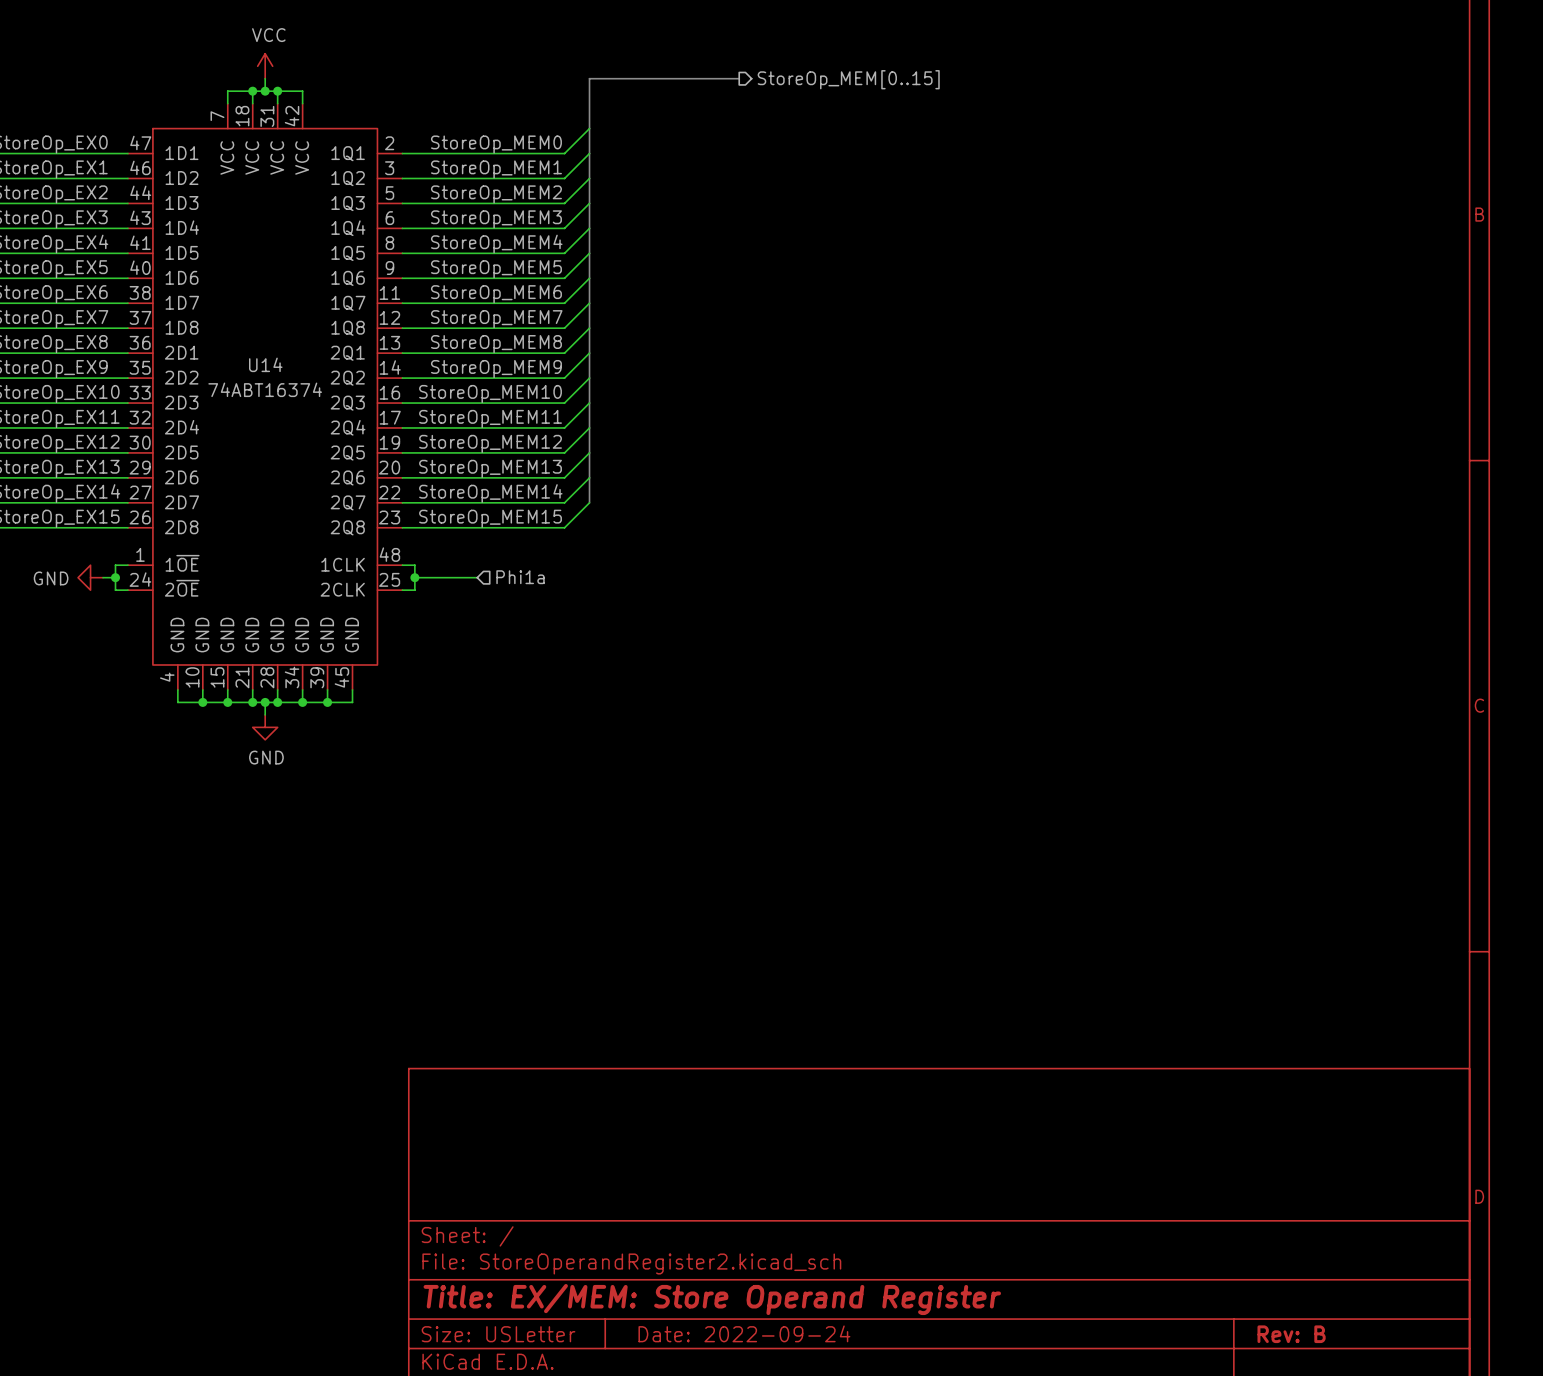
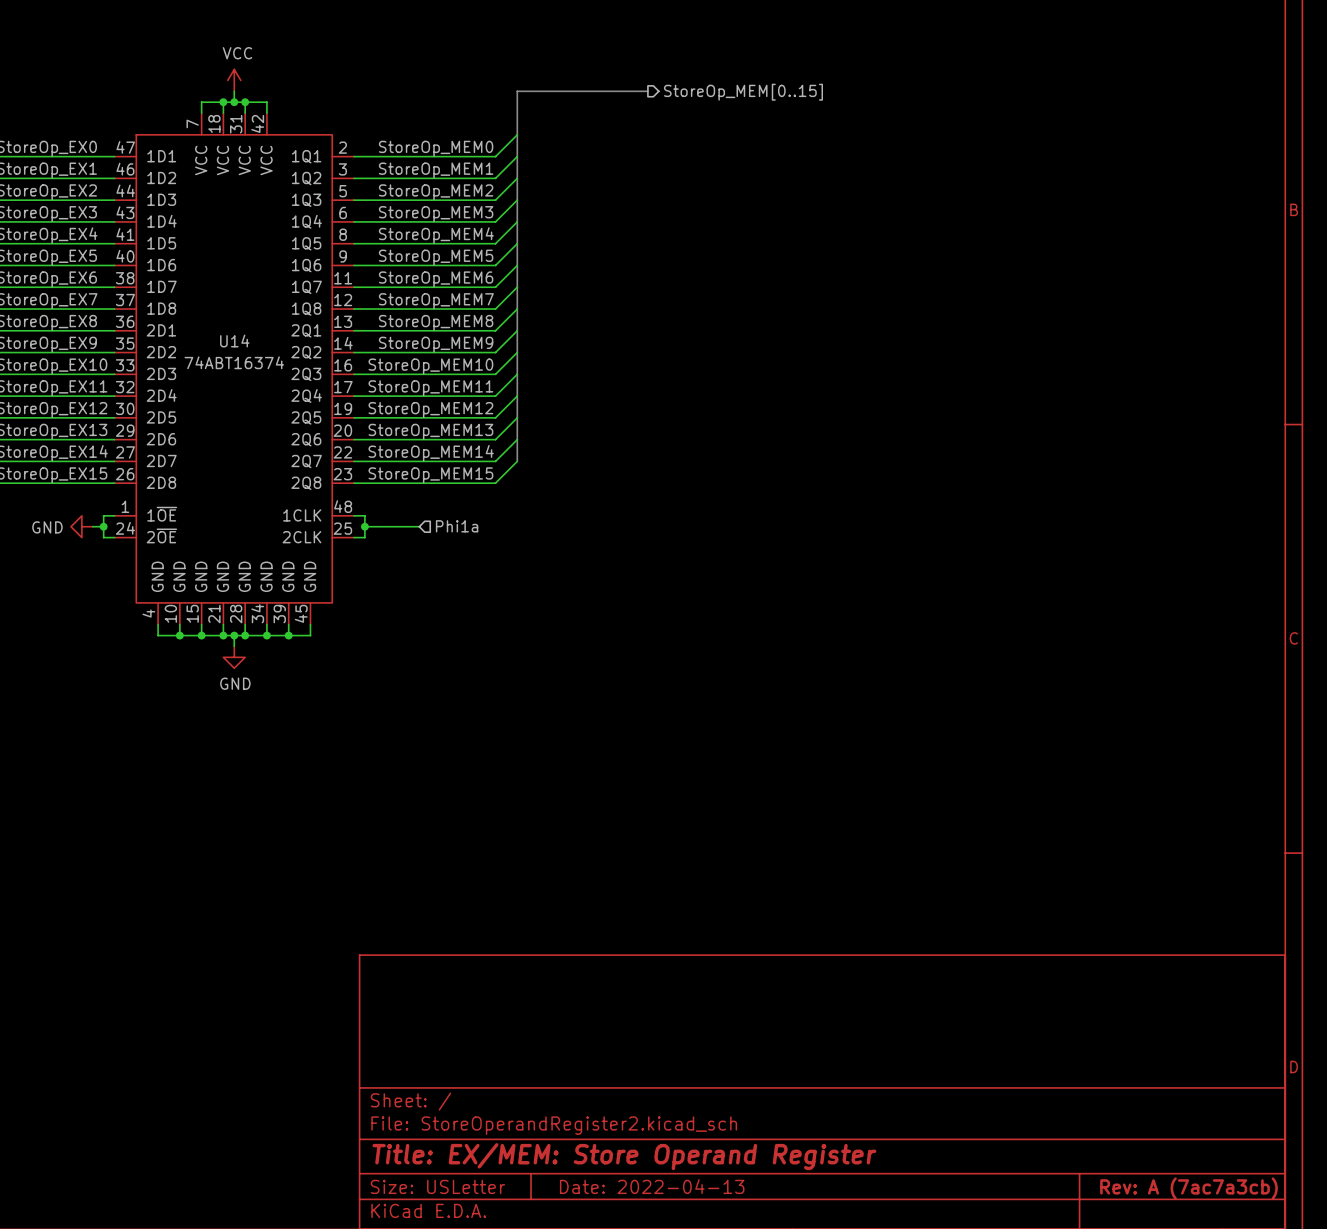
title block: Date: 2022-09-24 (744, 1333) -> Date: 2022-04-13 (652, 1186)
title block: Rev: B (1291, 1334) -> Rev: A (7ac7a3cb) (1189, 1188)

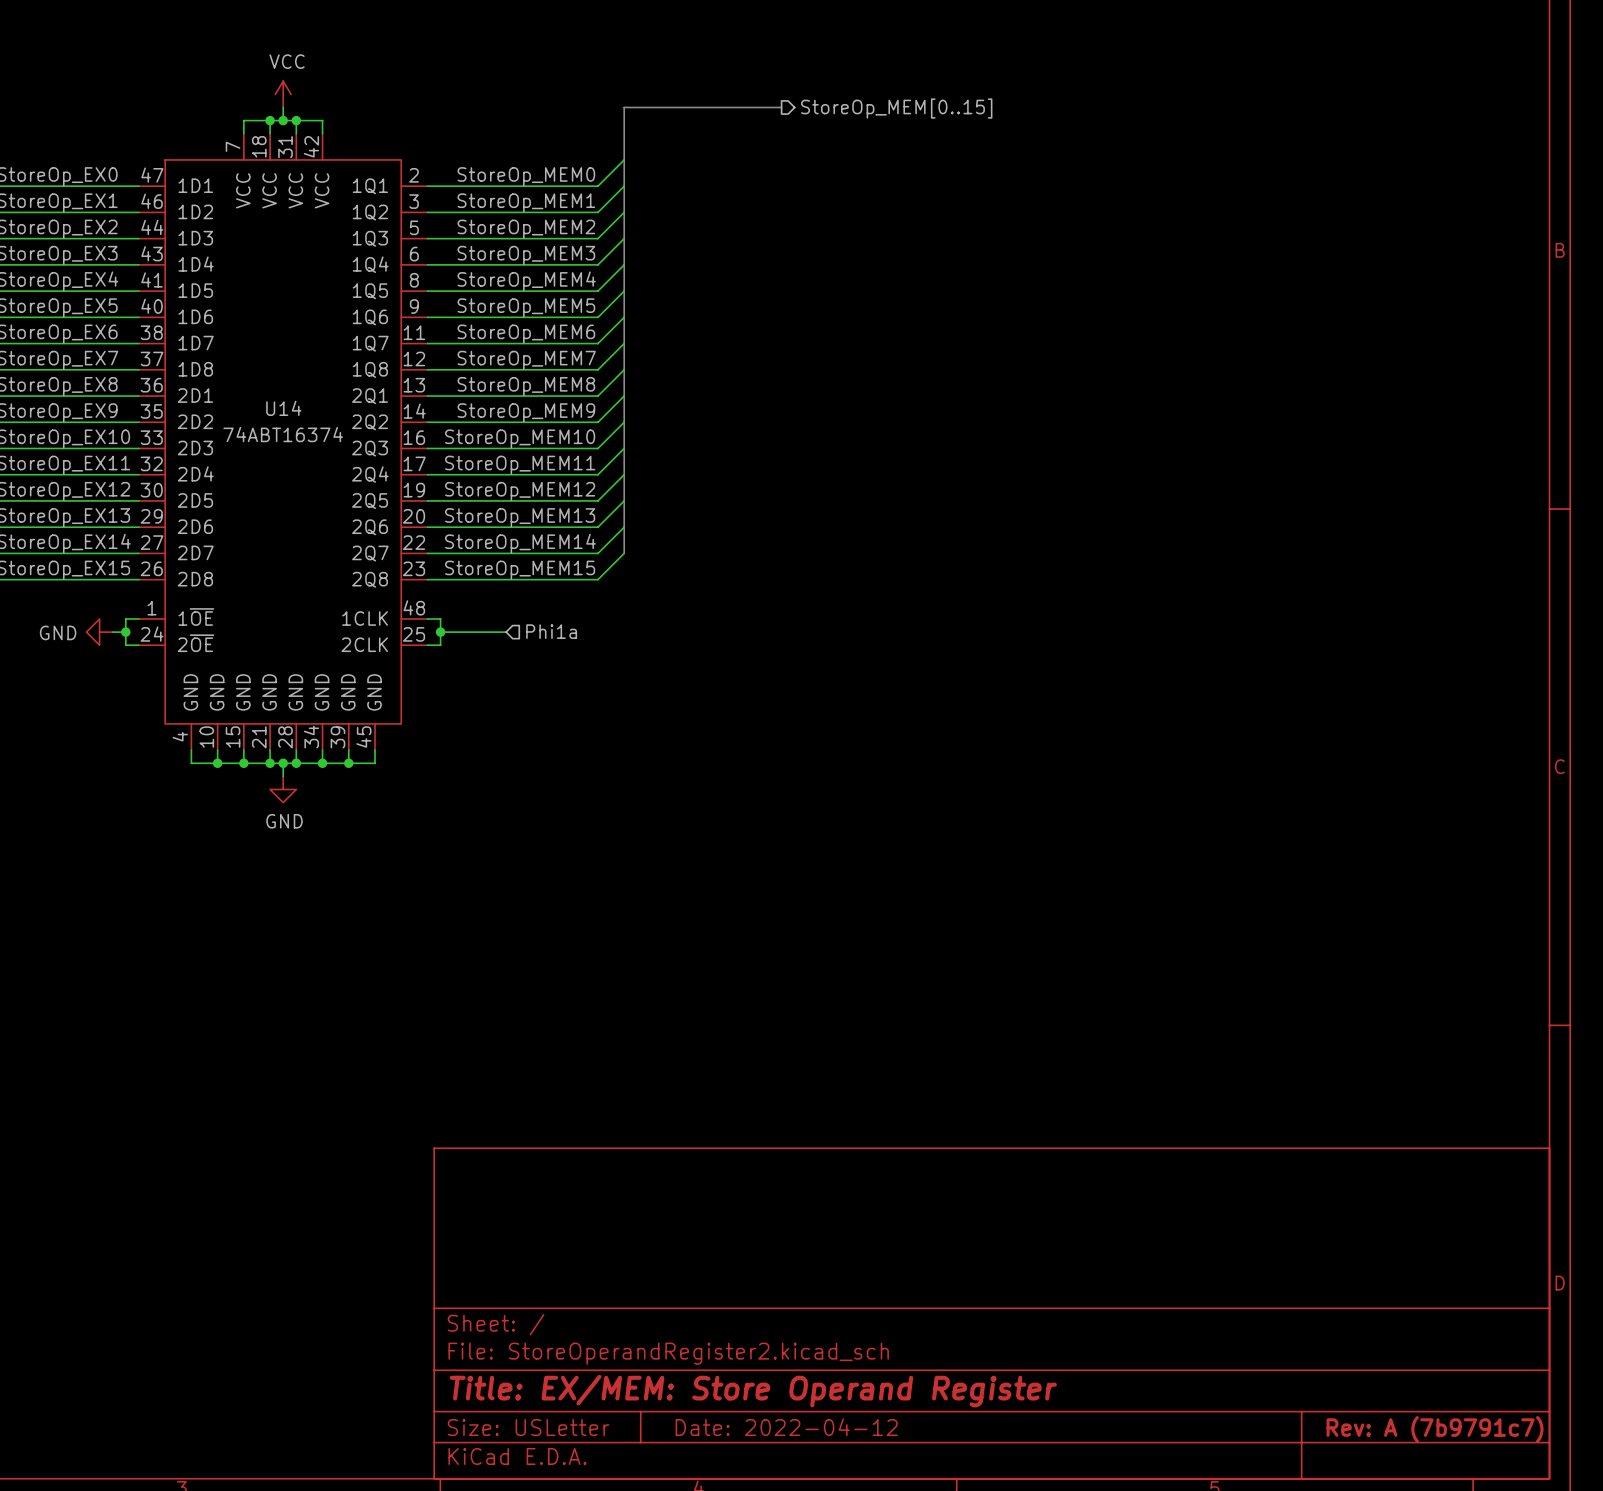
title block: Date: 2022-04-13 (652, 1186) -> Date: 2022-04-12 (786, 1427)
title block: Rev: A (7ac7a3cb) (1189, 1188) -> Rev: A (7b9791c7) (1435, 1429)

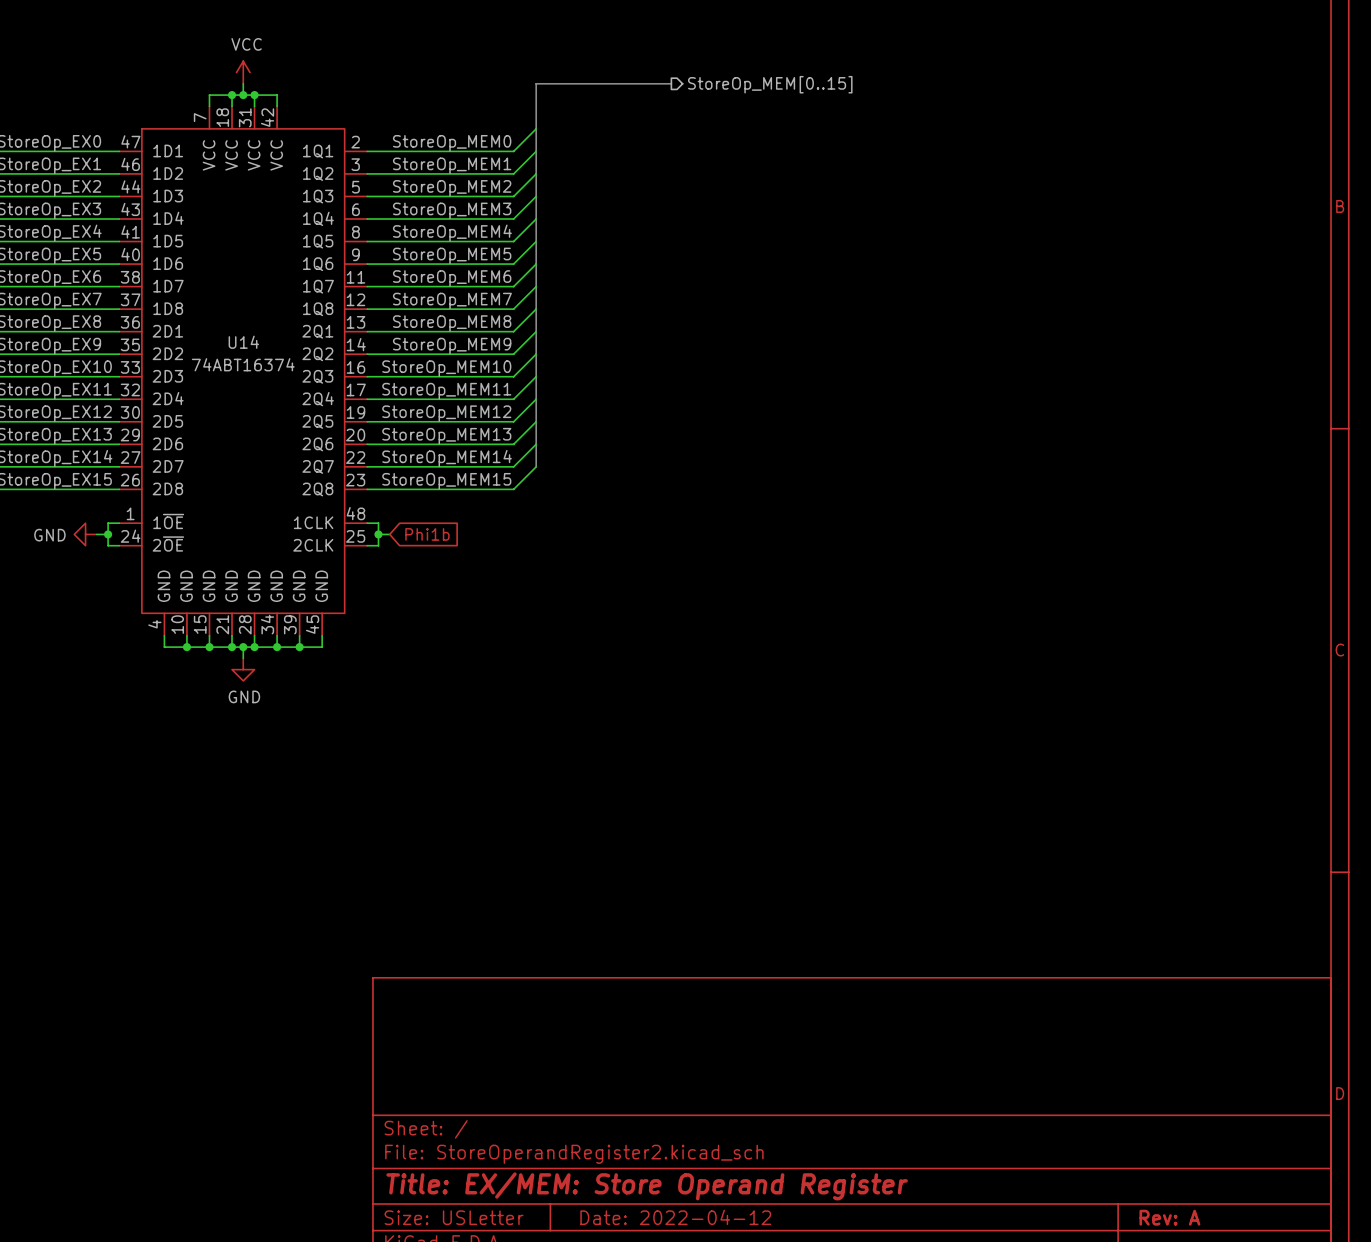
hierarchical label: Phi1a (551, 631) -> none
wire: (453, 632) (506, 632) -> none
global label: none -> Phi1b (427, 534)
title block: Rev: A (7b9791c7) (1435, 1429) -> Rev: A (1169, 1217)

